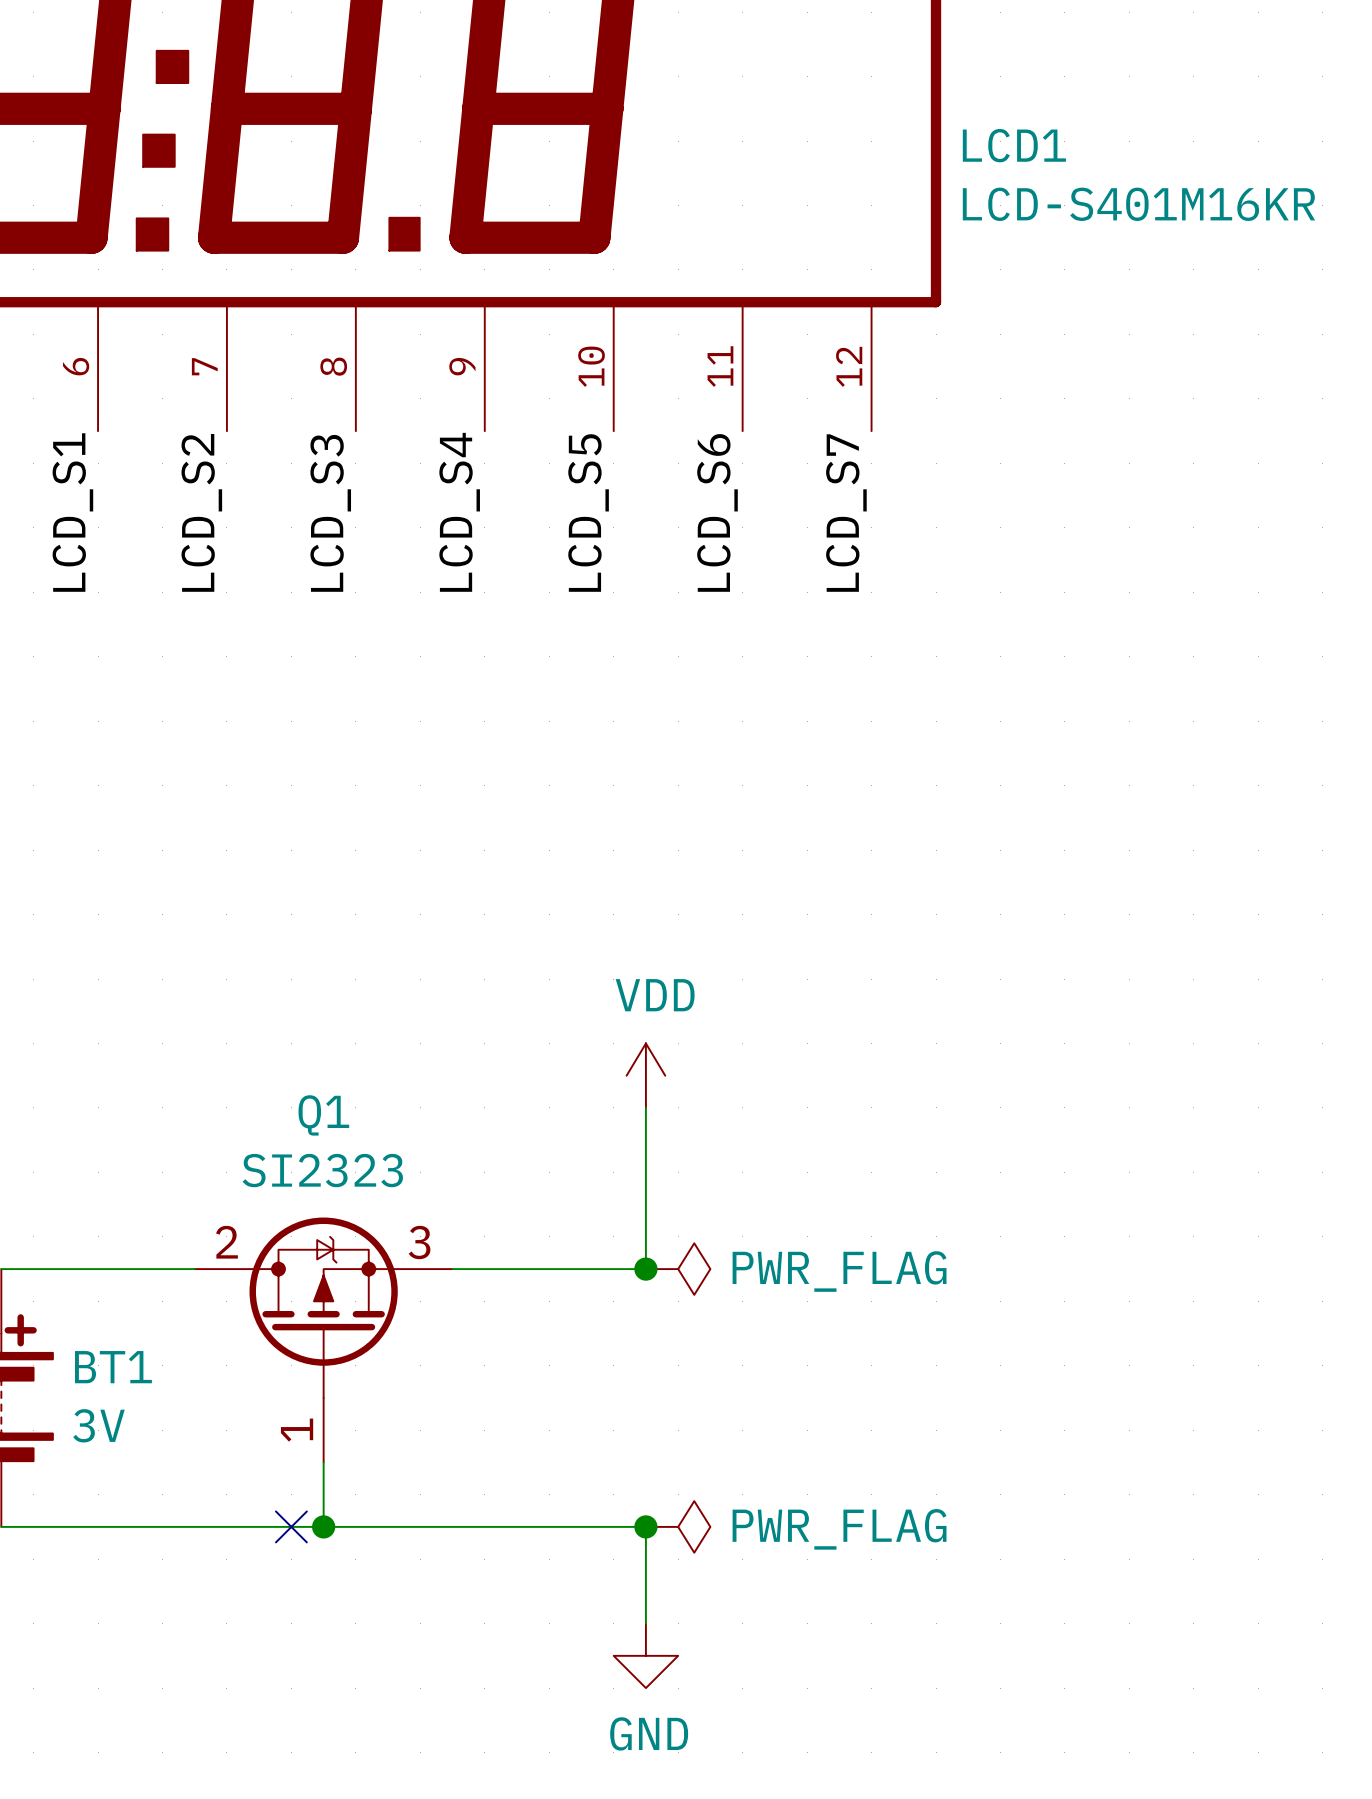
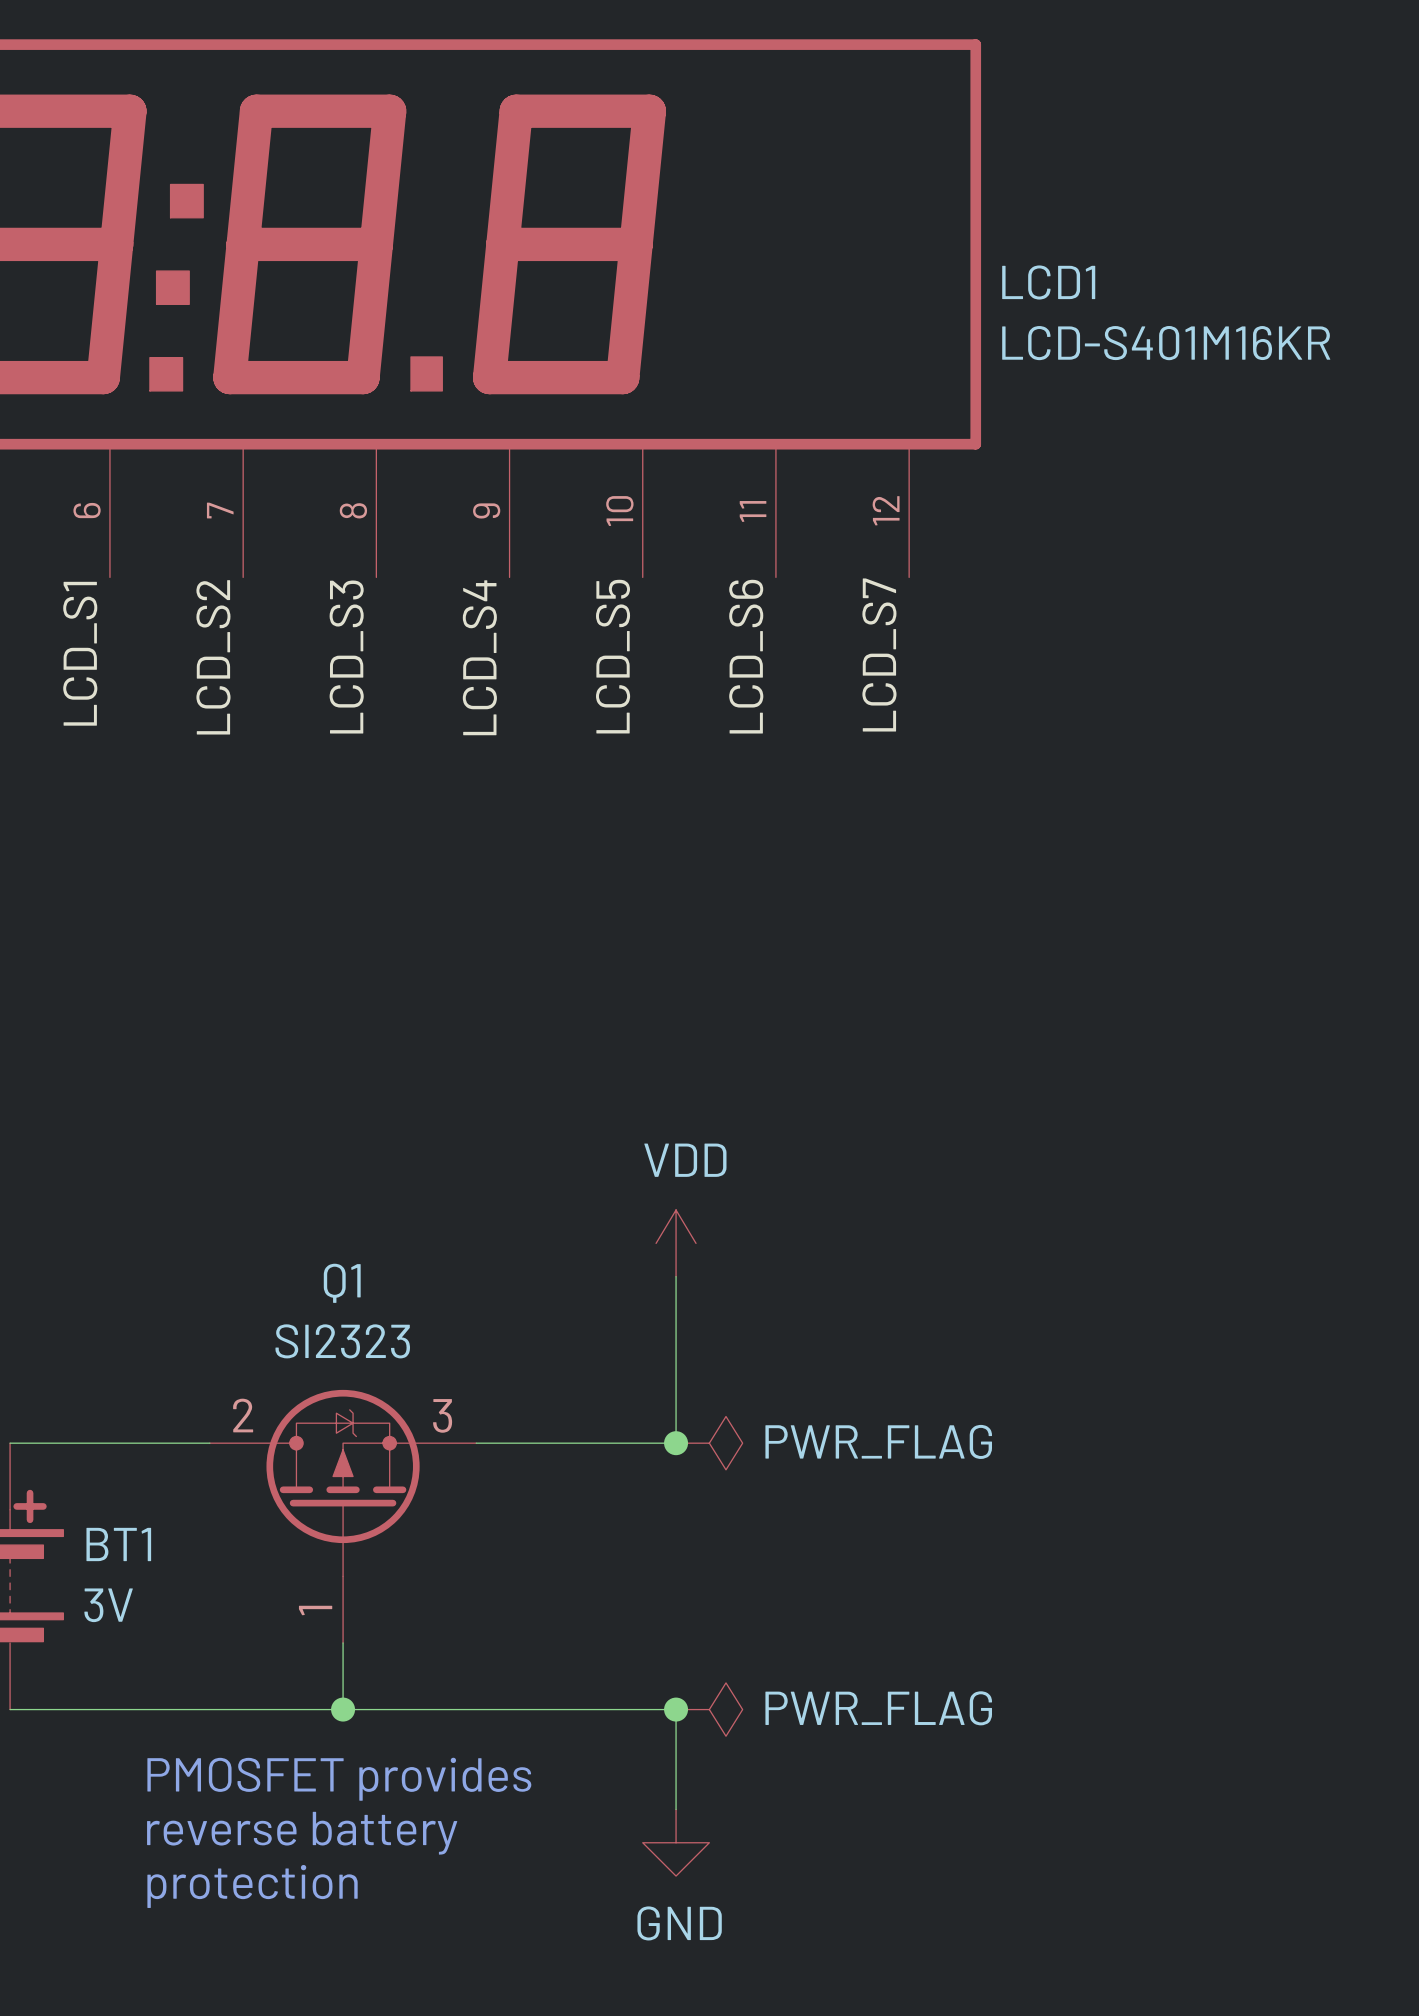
no-connect mark: (291, 1526) -> none
text: none -> PMOSFET provides (339, 1779)
text: none -> reverse battery (302, 1833)
text: none -> protection (252, 1886)

